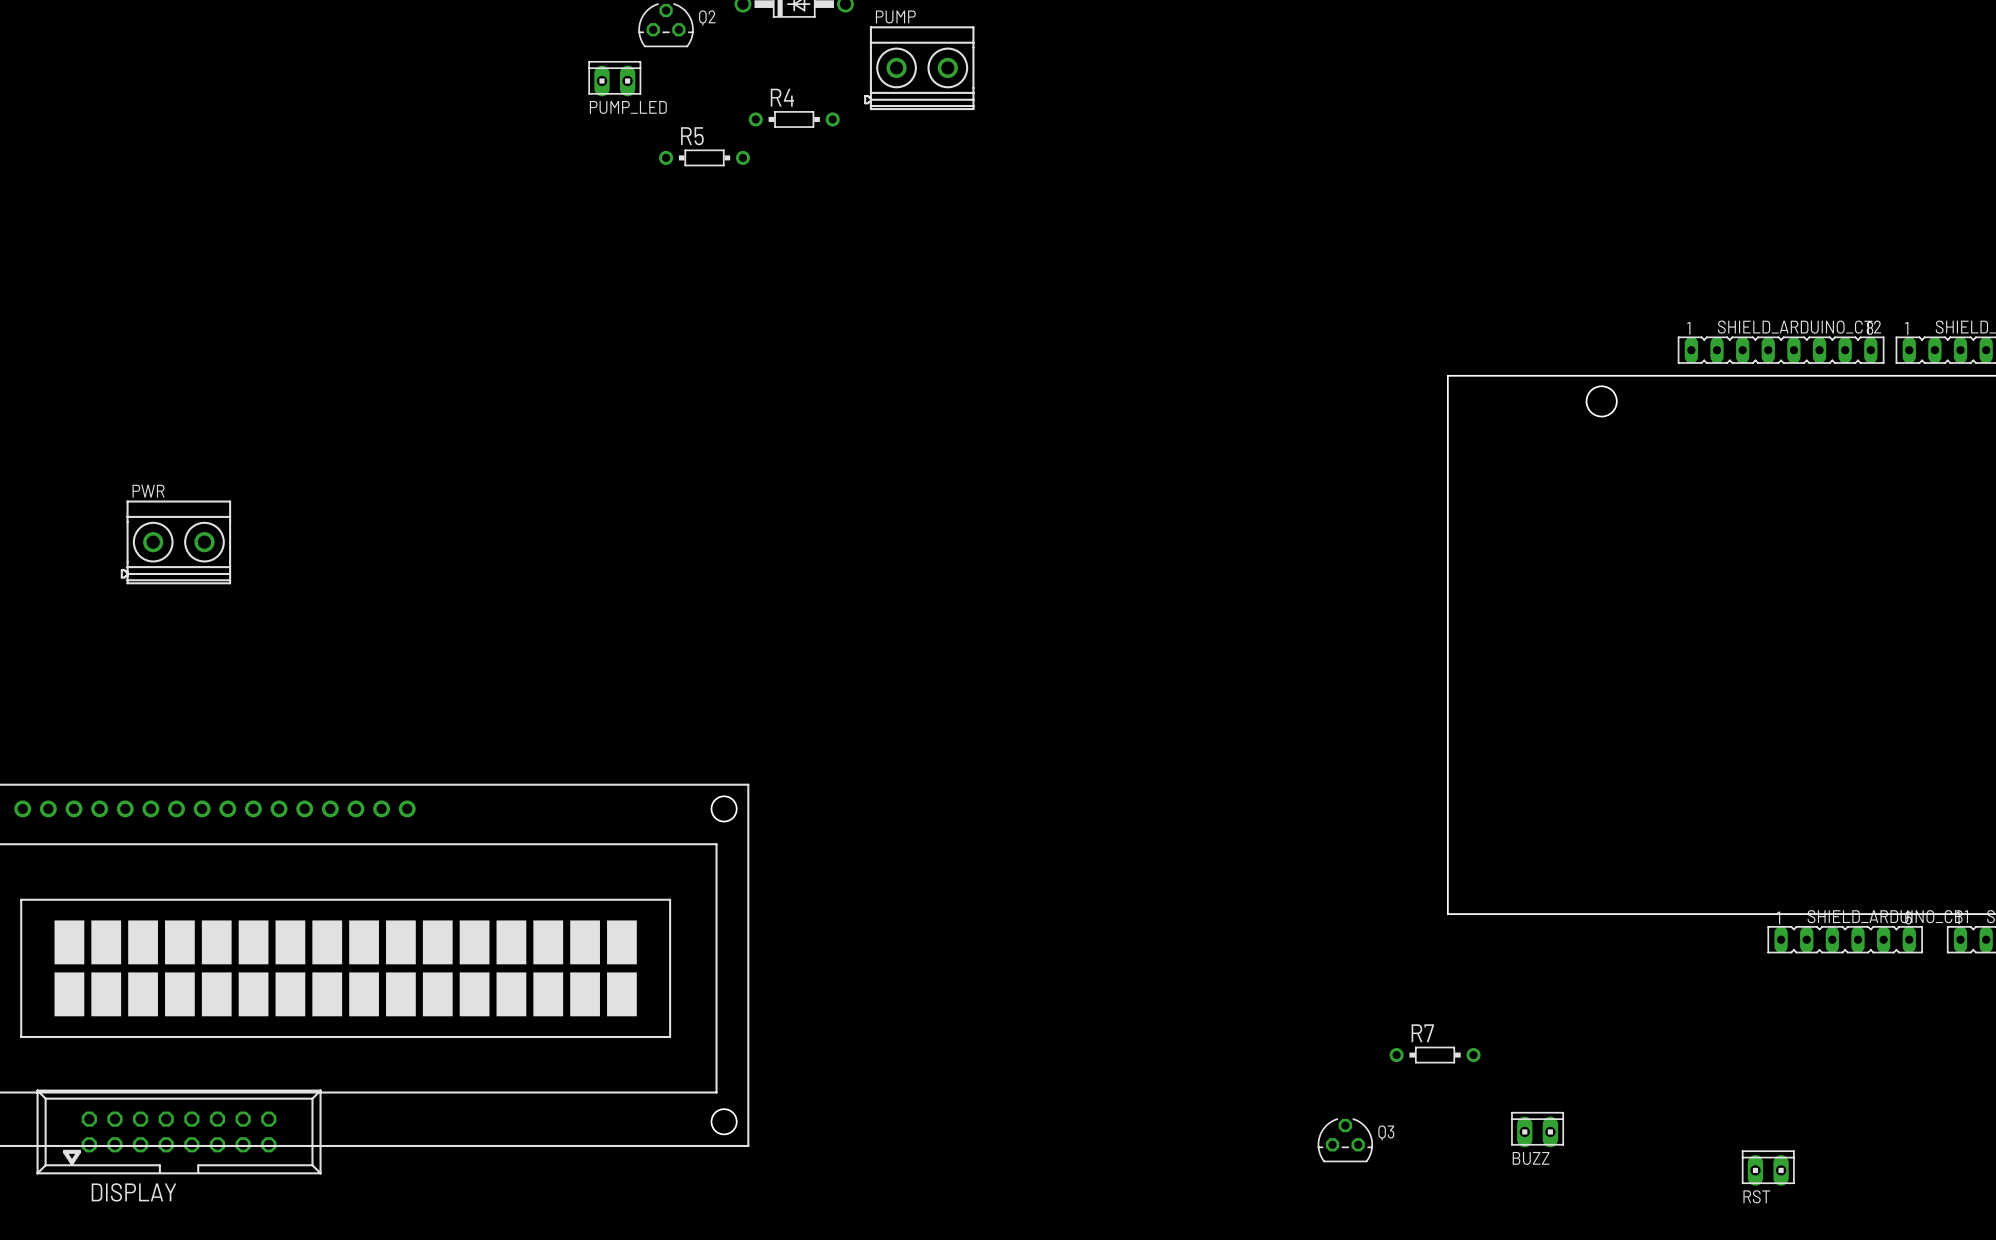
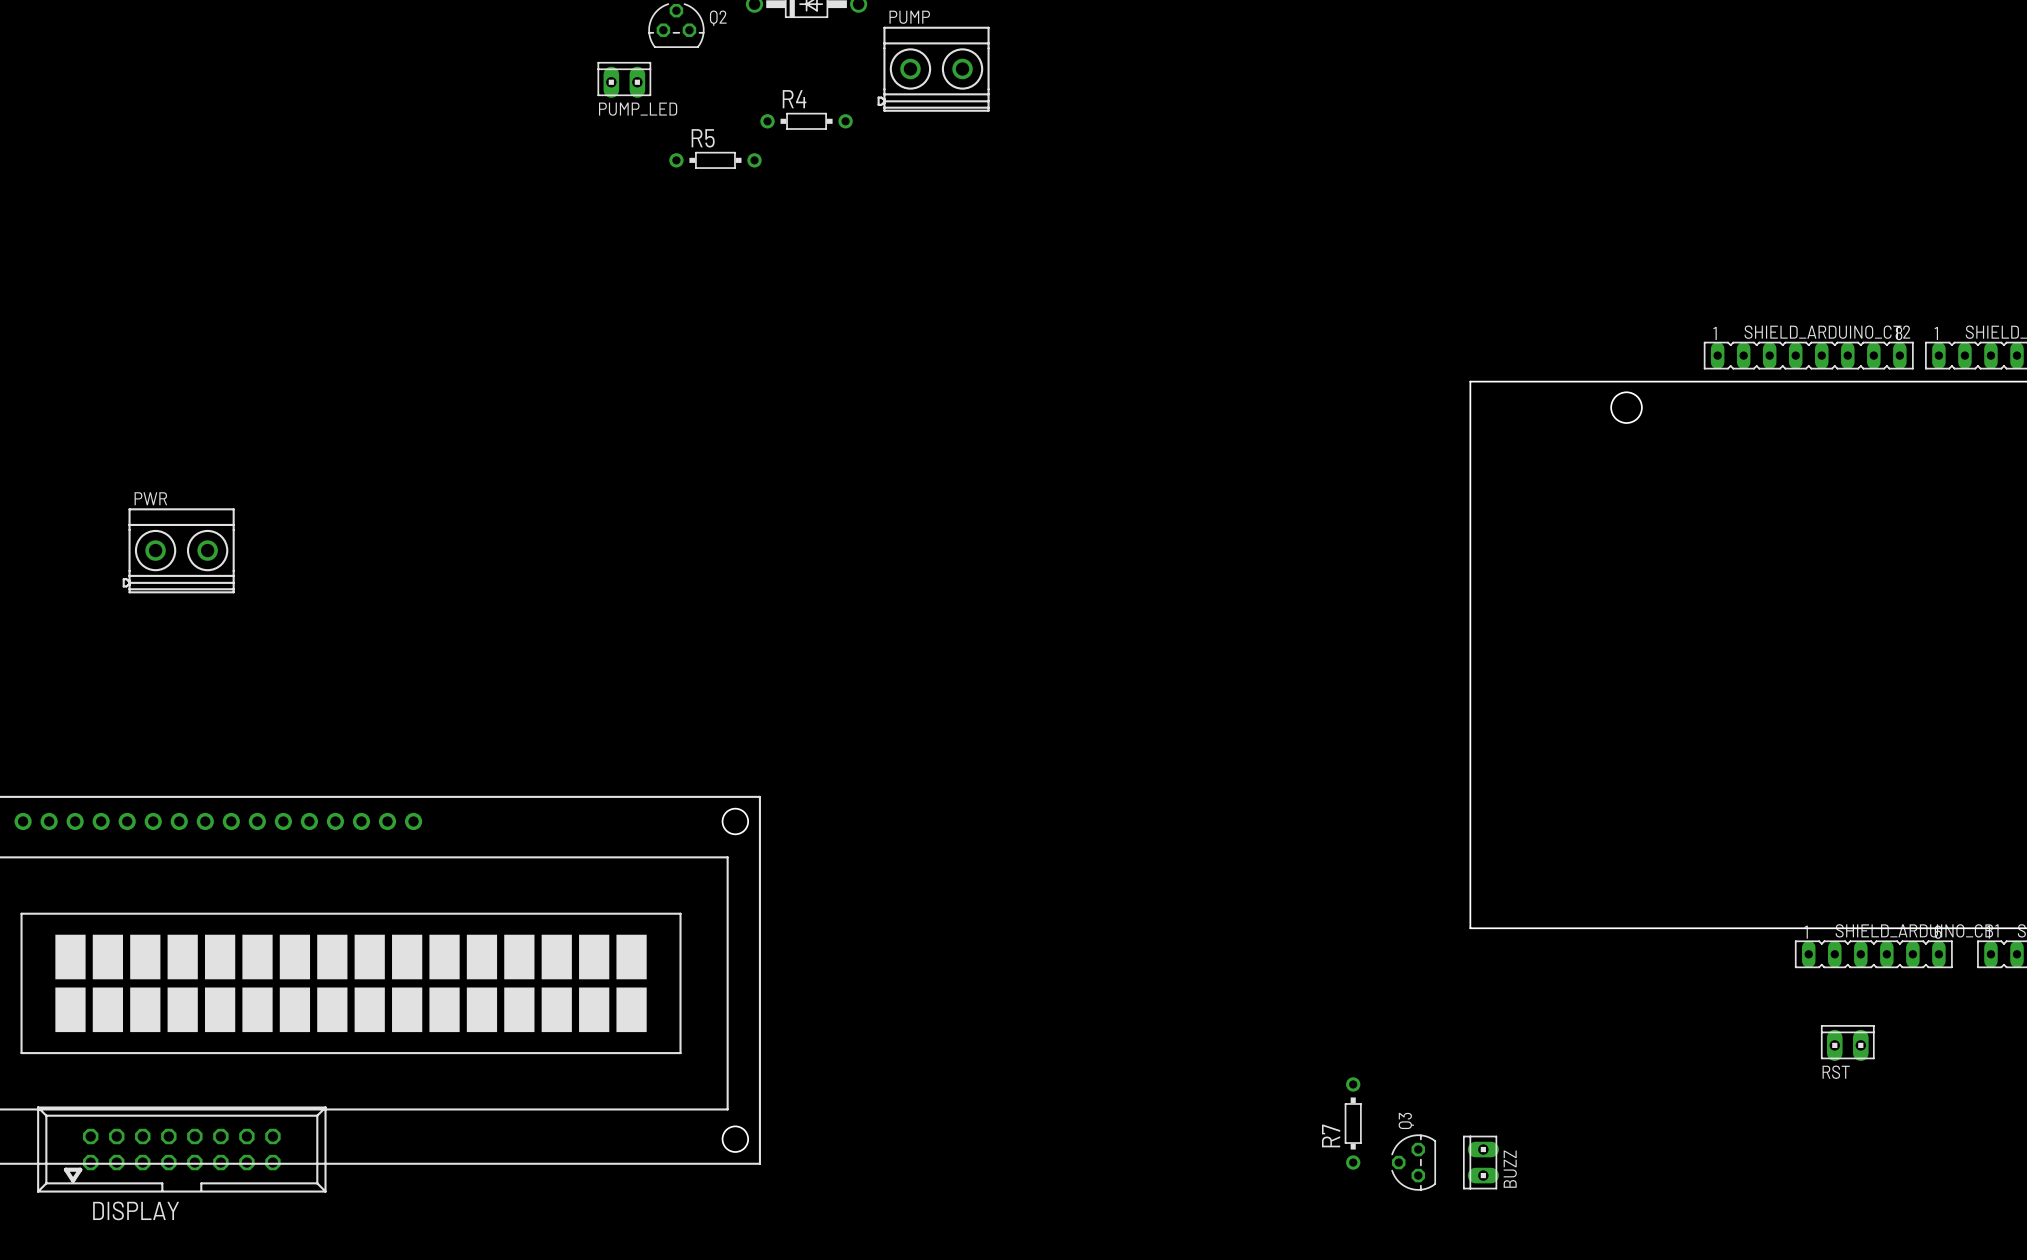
R7 name position: R7 (1422, 1033) -> R7 (1331, 1135)
R7 rotation: 0° (1435, 1055) -> 90° clockwise (1353, 1123)
R7 position: (1435, 1055) -> (1353, 1123)
BUZZ rotation: 0° (1537, 1129) -> 90° counterclockwise (1481, 1162)
BUZZ position: (1537, 1129) -> (1481, 1162)
Q3 rotation: 0° (1345, 1140) -> 90° counterclockwise (1413, 1162)
Q3 position: (1345, 1140) -> (1413, 1162)
RST position: (1768, 1168) -> (1847, 1043)

